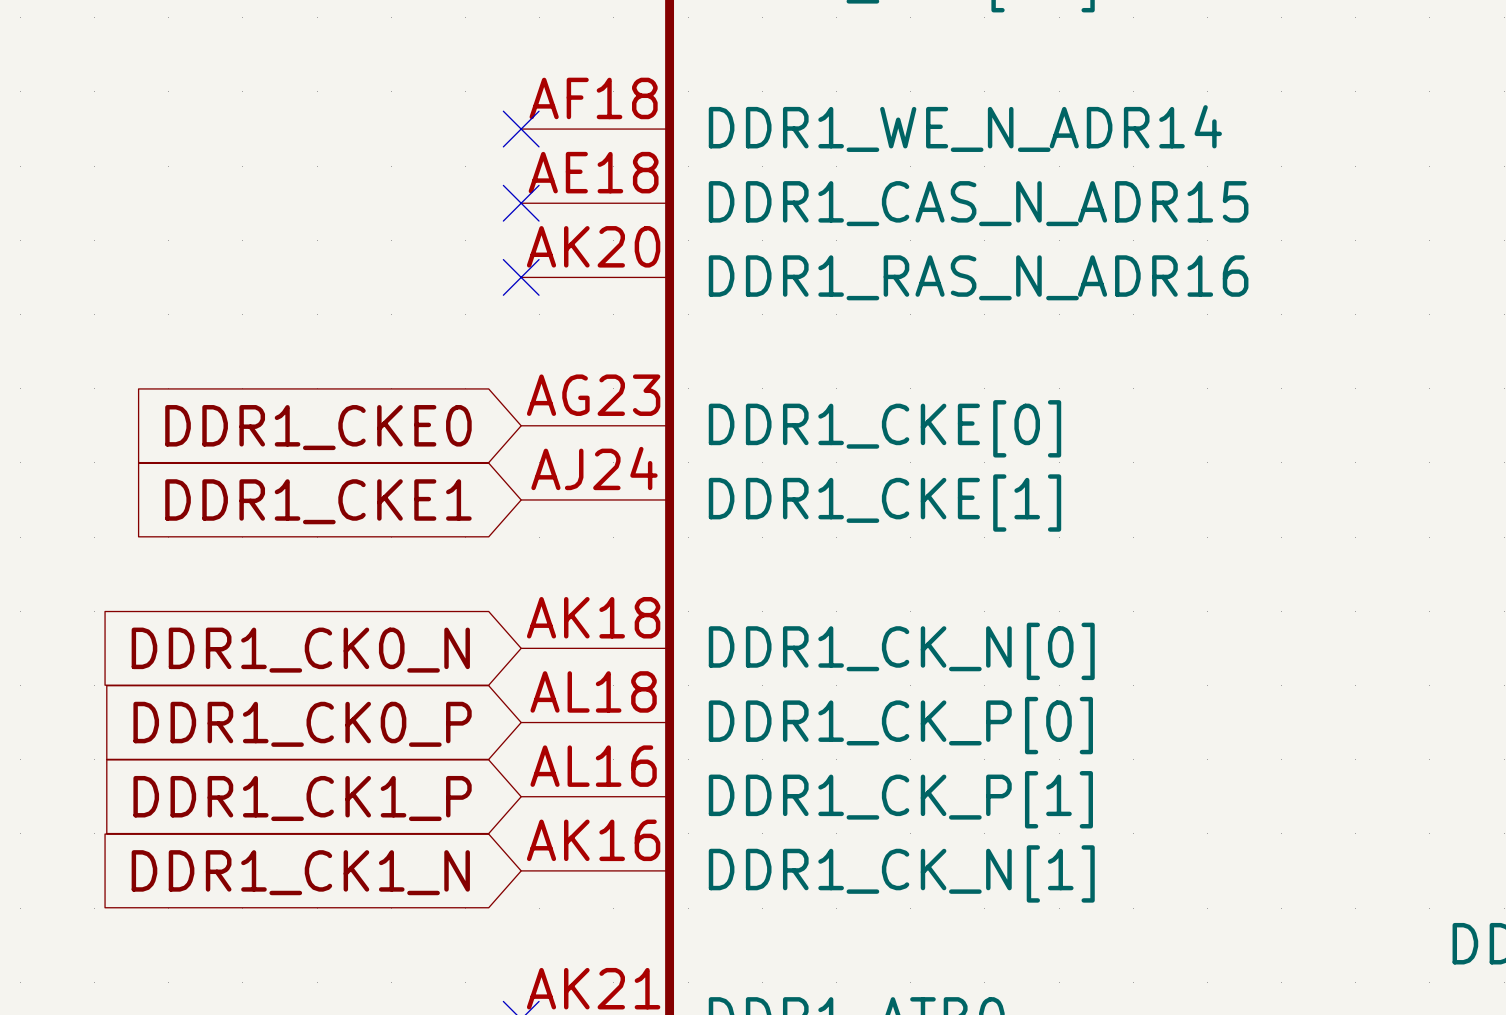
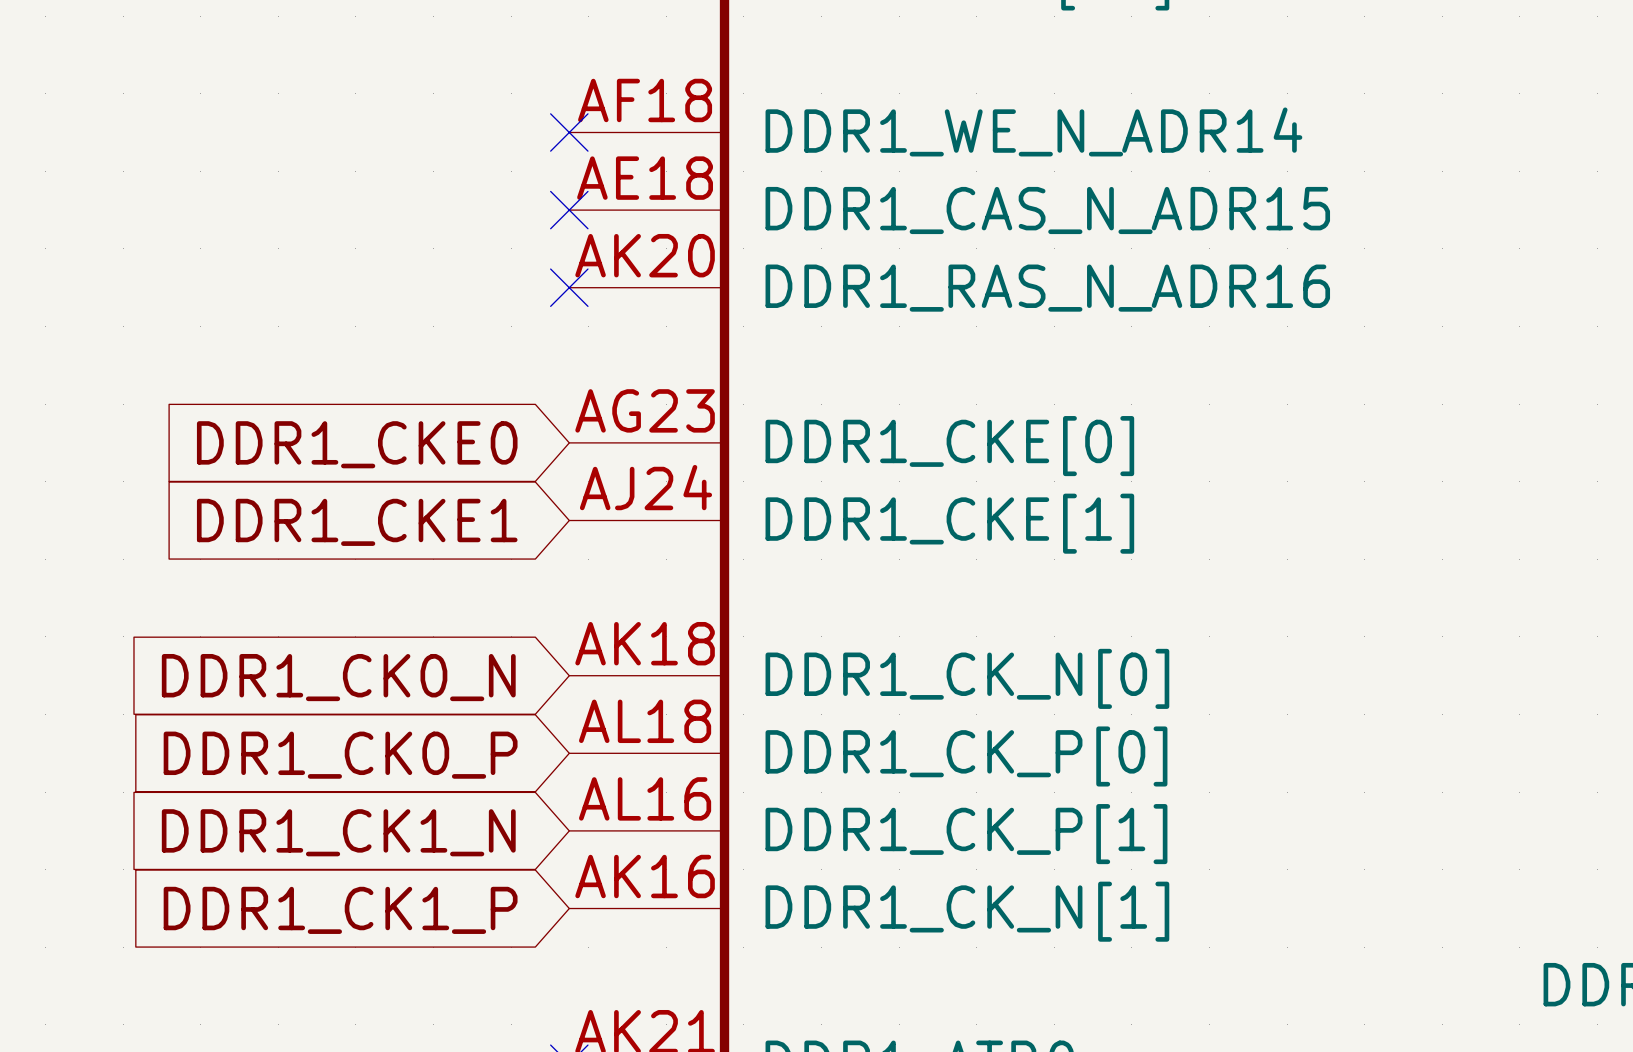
global label: DDR1_CK1_P (302, 798) -> DDR1_CK1_N (338, 832)
global label: DDR1_CK1_N (300, 872) -> DDR1_CK1_P (340, 910)

